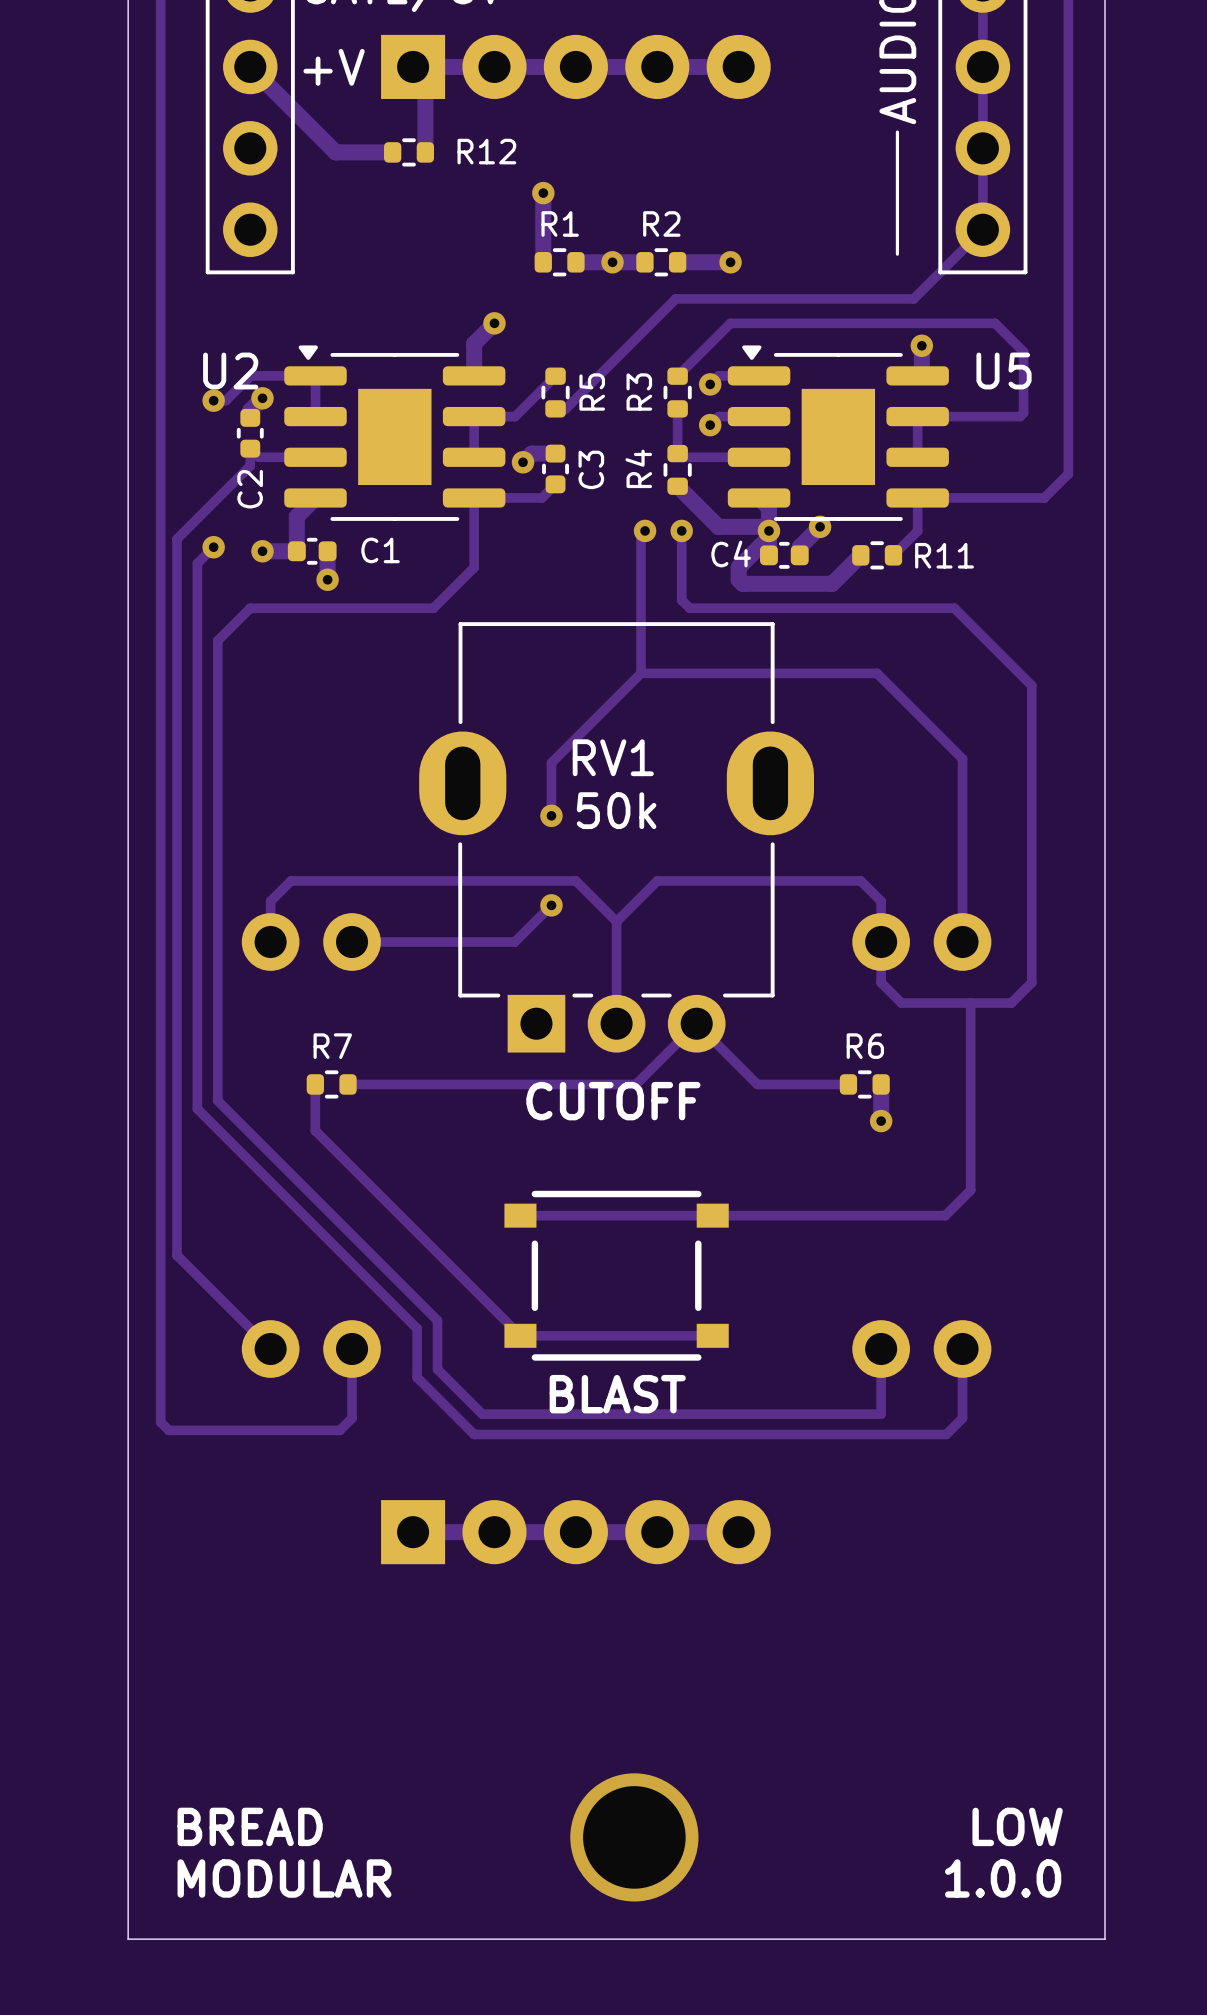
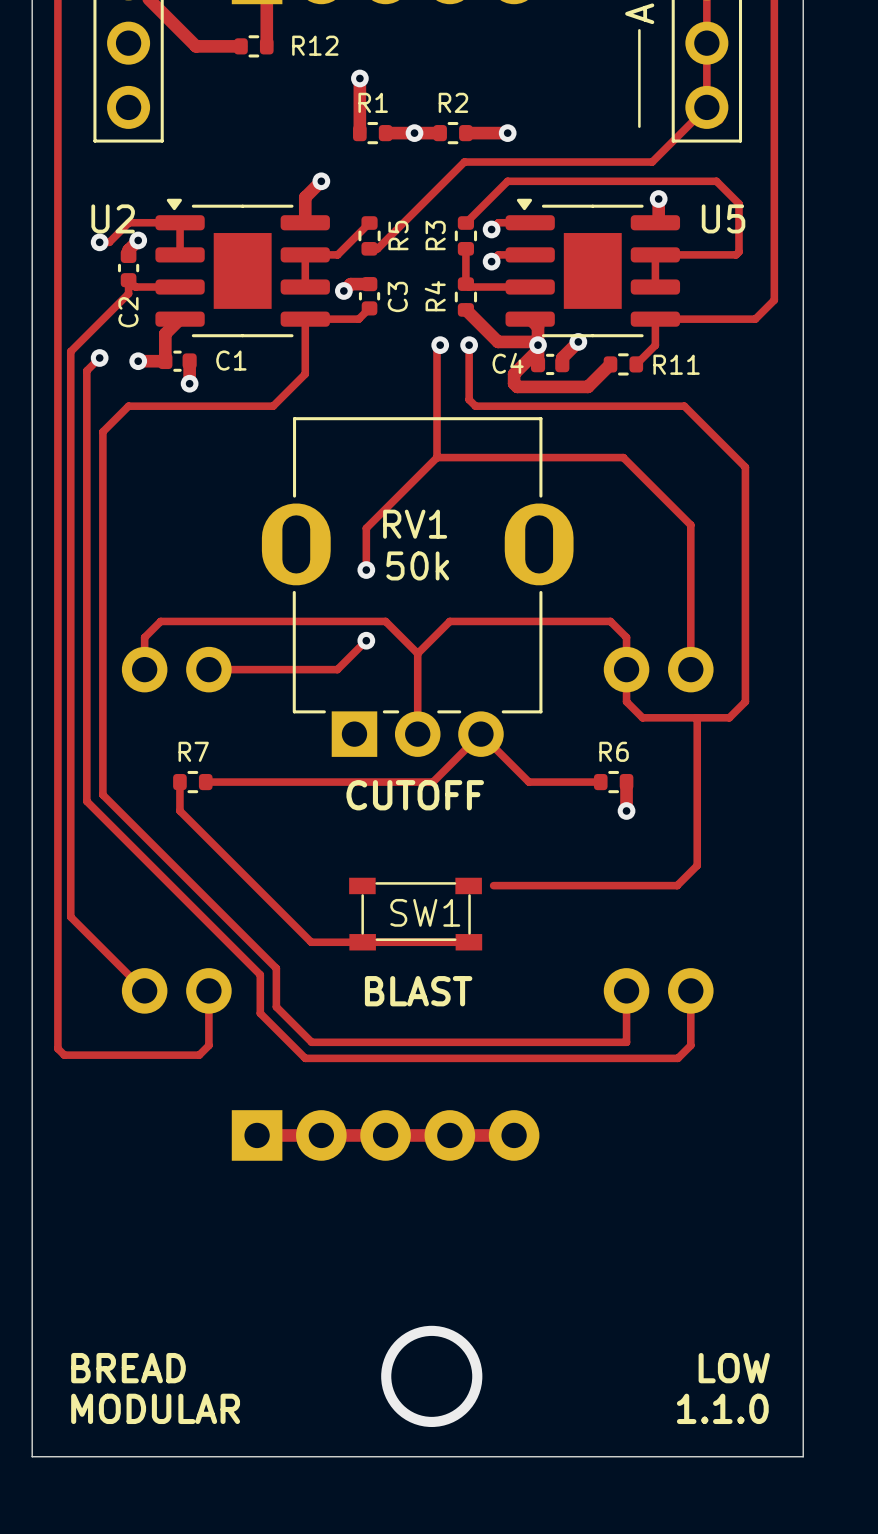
track: (315, 1121) (315, 1130) (520, 1335) (712, 1335) -> (179, 810) (311, 942) (468, 942)
track: (520, 1215) (712, 1215) -> none
SW1: none -> (415, 914)
part: (616, 1275) -> none
text position: BLAST (617, 1394) -> BLAST (418, 991)
text: 1.0.0 (1003, 1878) -> 1.1.0 (722, 1408)

